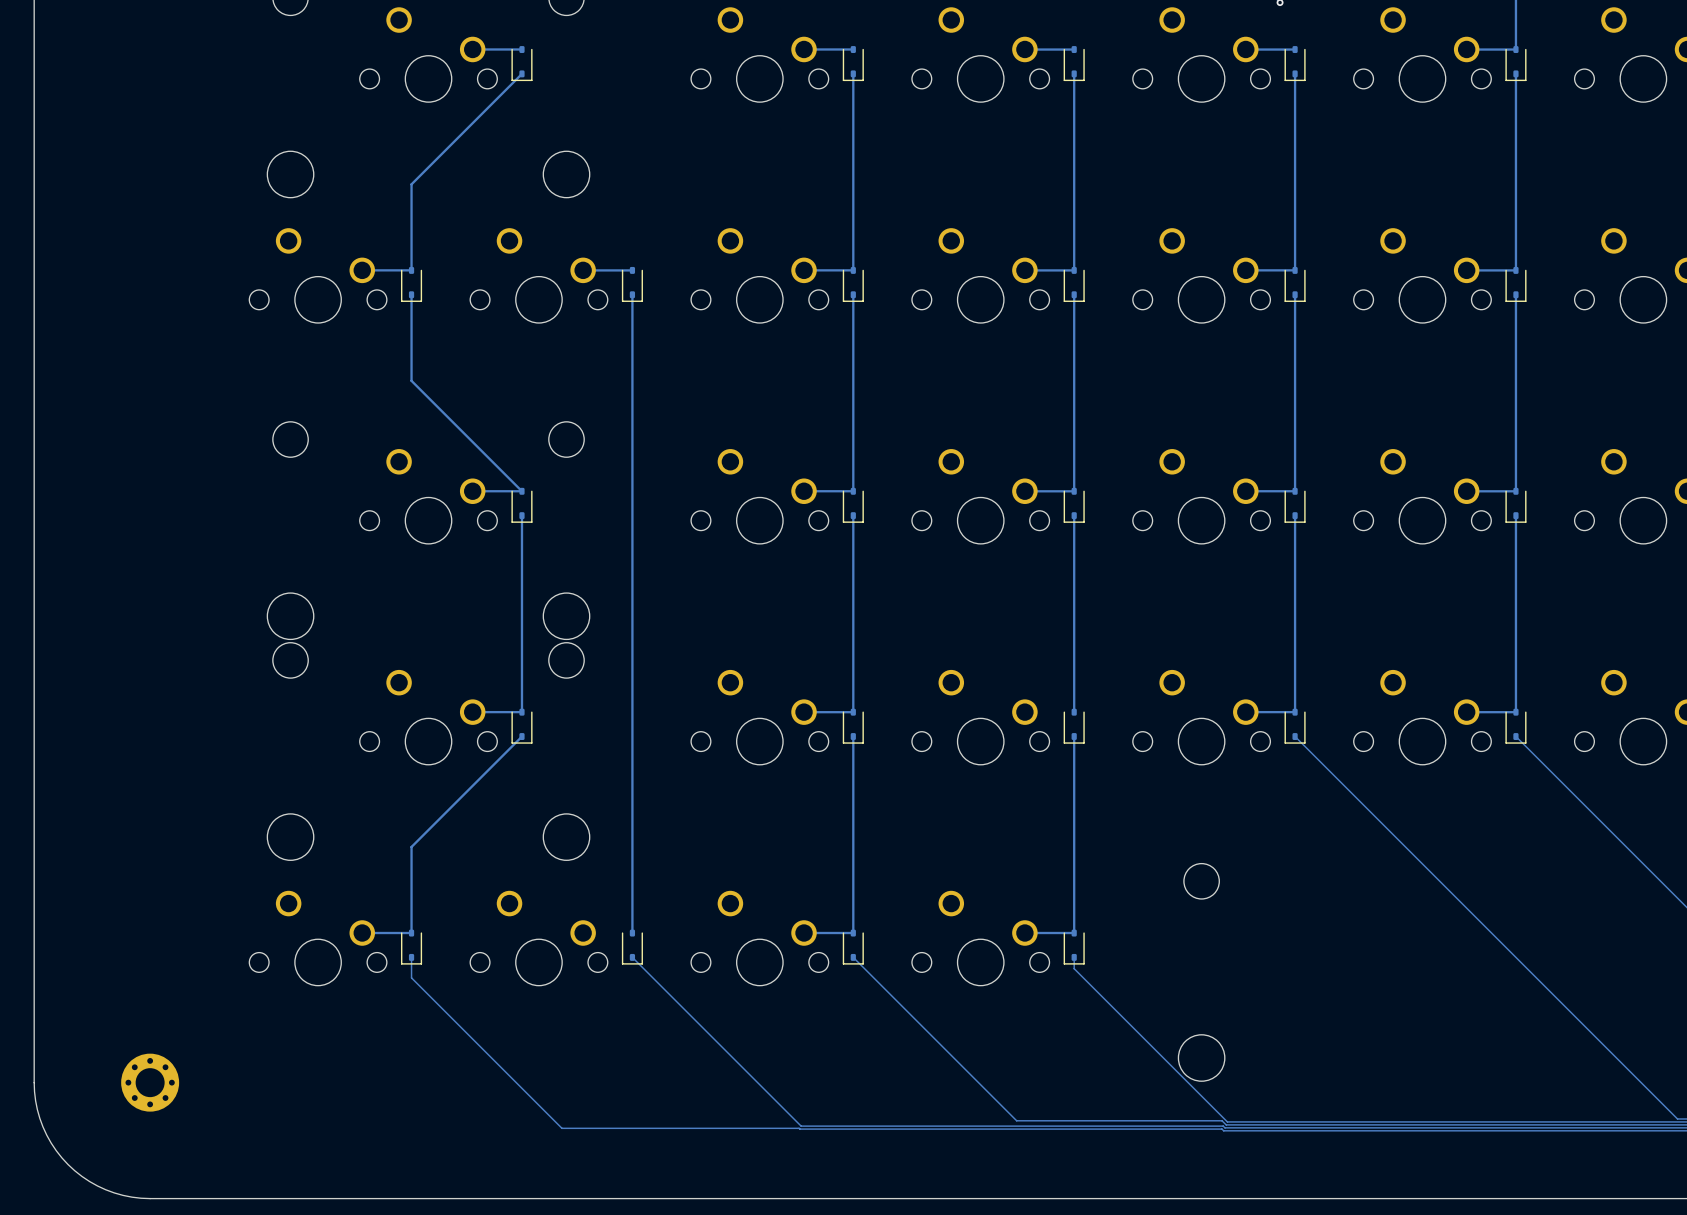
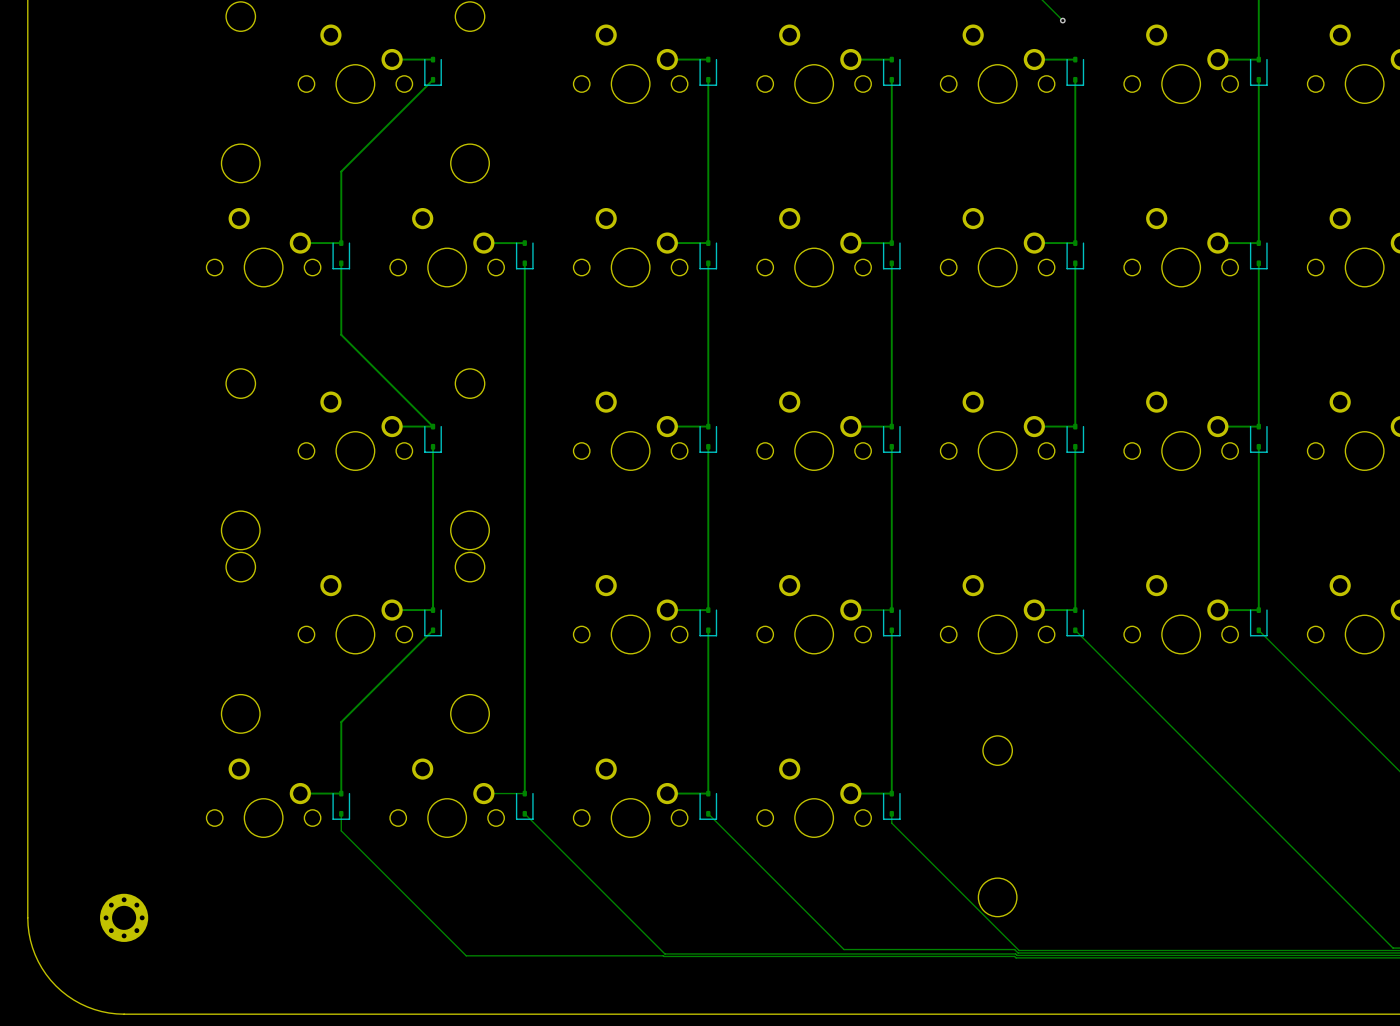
track: none -> (891, 610) (850, 610)
track: none -> (524, 793) (483, 793)

